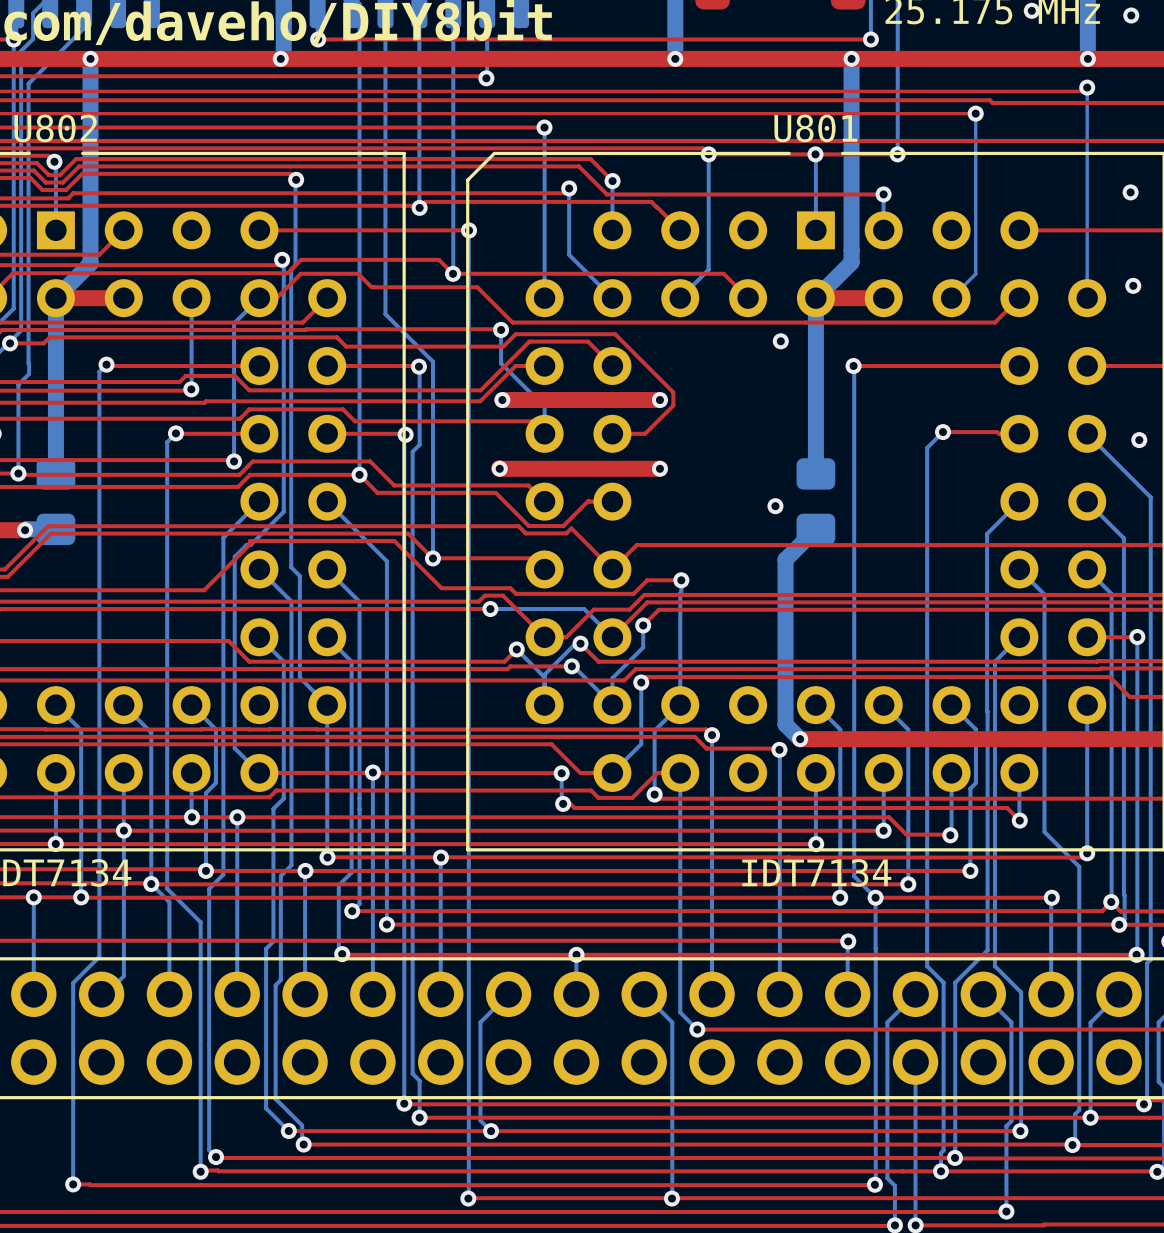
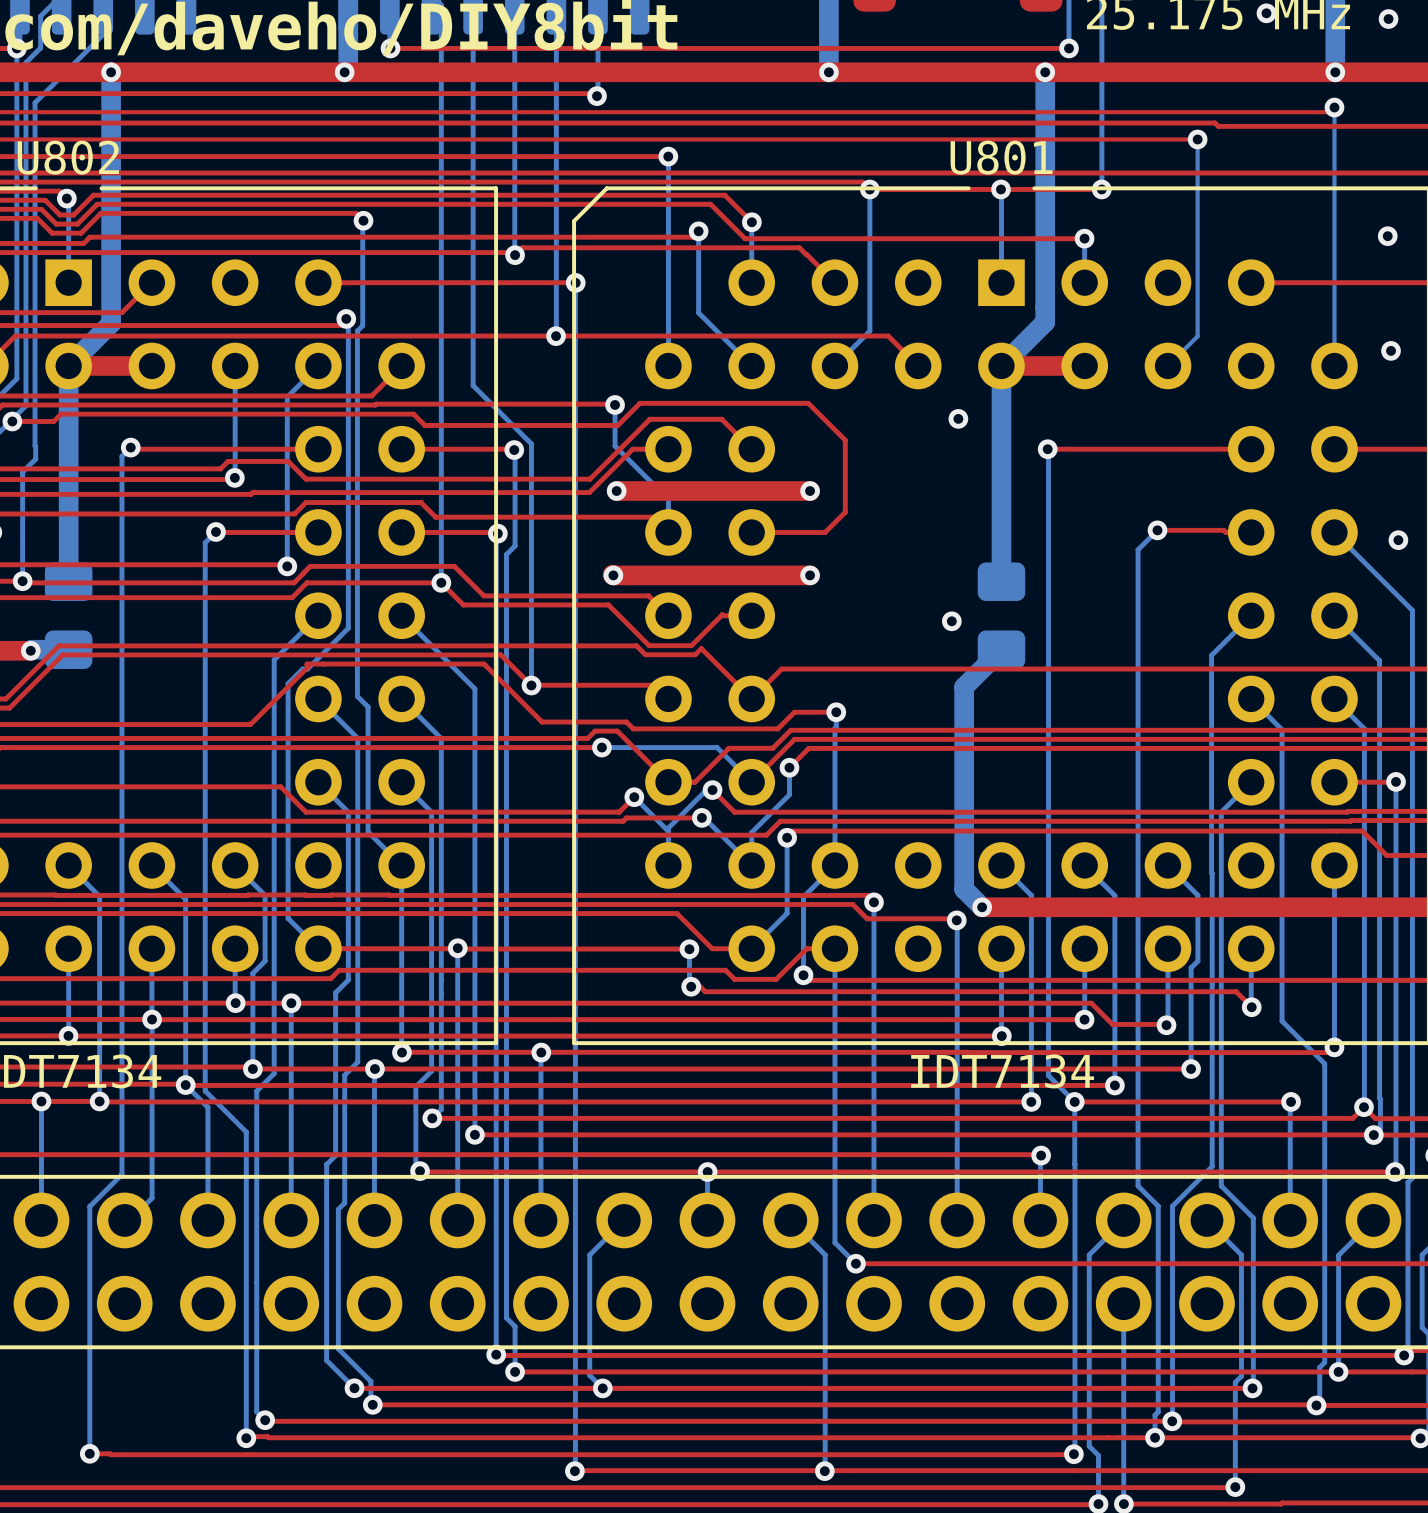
top track: (12, 273) (287, 273) (301, 259) (438, 259) (452, 273) -> (15, 336) (369, 336)
top track: (300, 273) (276, 298) (259, 298) -> none
top track: (358, 273) (371, 287) (477, 287) (512, 322) (995, 322) (1019, 298) -> (439, 336) (556, 336)
top track: (515, 334) (615, 334) (673, 392) (673, 405) (645, 433) -> (633, 410) (639, 403) (808, 403) (845, 440) (845, 512) (825, 532) (791, 532)

